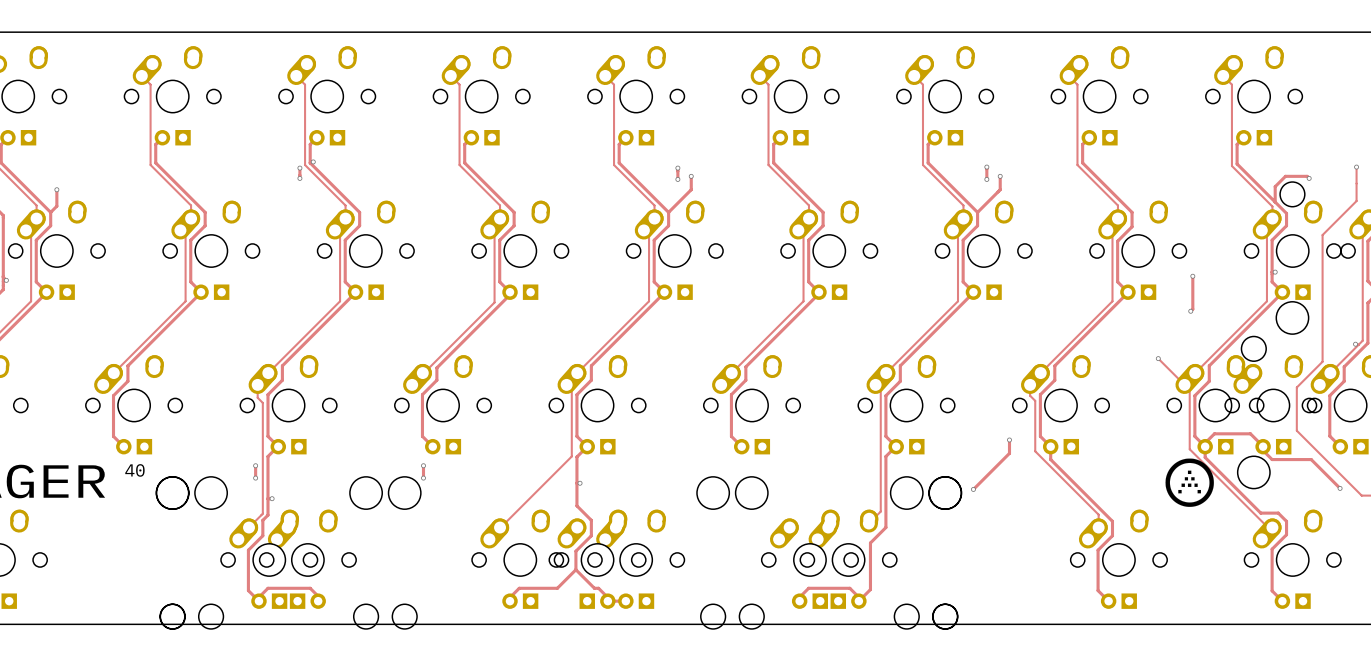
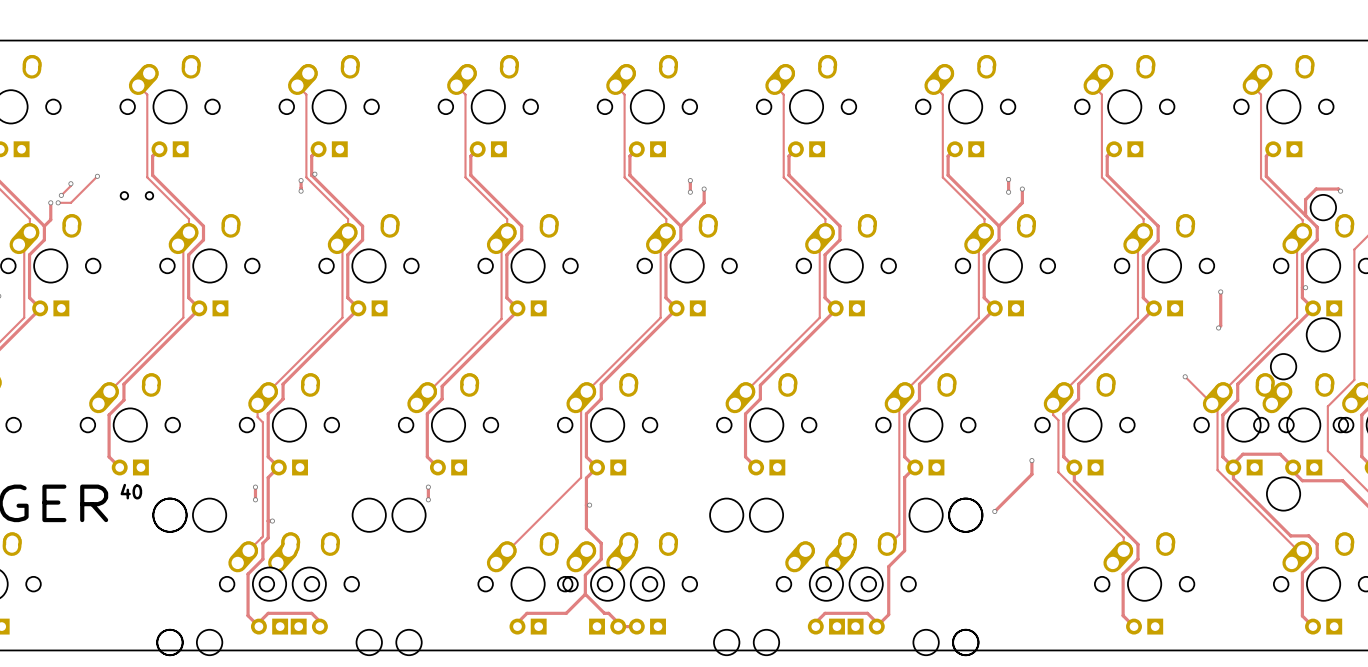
track: none -> (97, 176) (70, 202) (58, 202)
via: none -> (97, 176)
track: none -> (70, 183) (61, 195)
via: none -> (70, 183)
via: none -> (61, 195)
part: none -> (136, 195)
via: none -> (58, 202)
drawing: [1165, 458, 1214, 507] -> none

